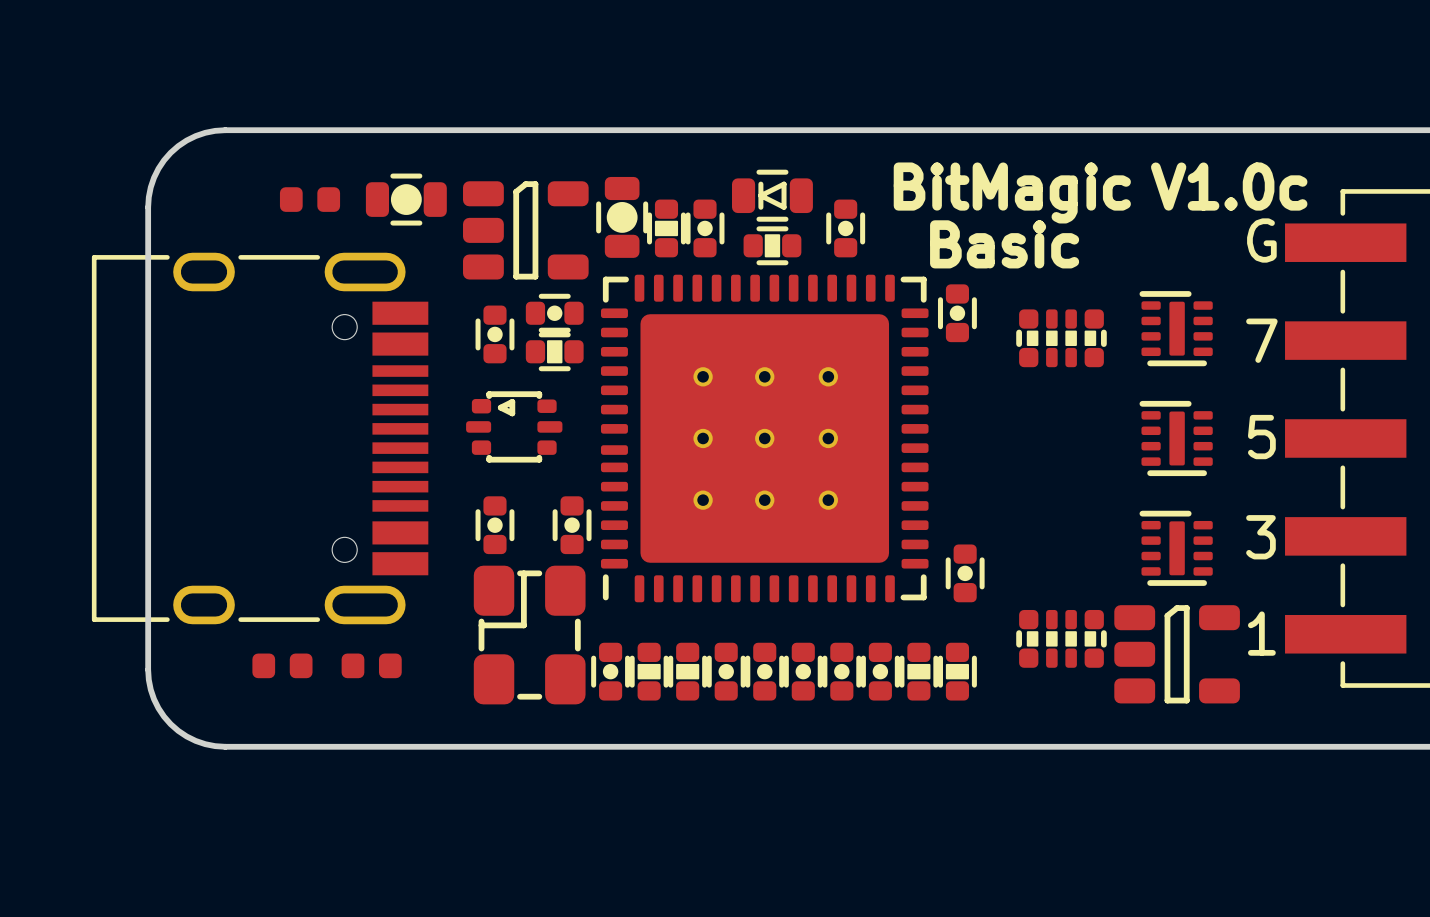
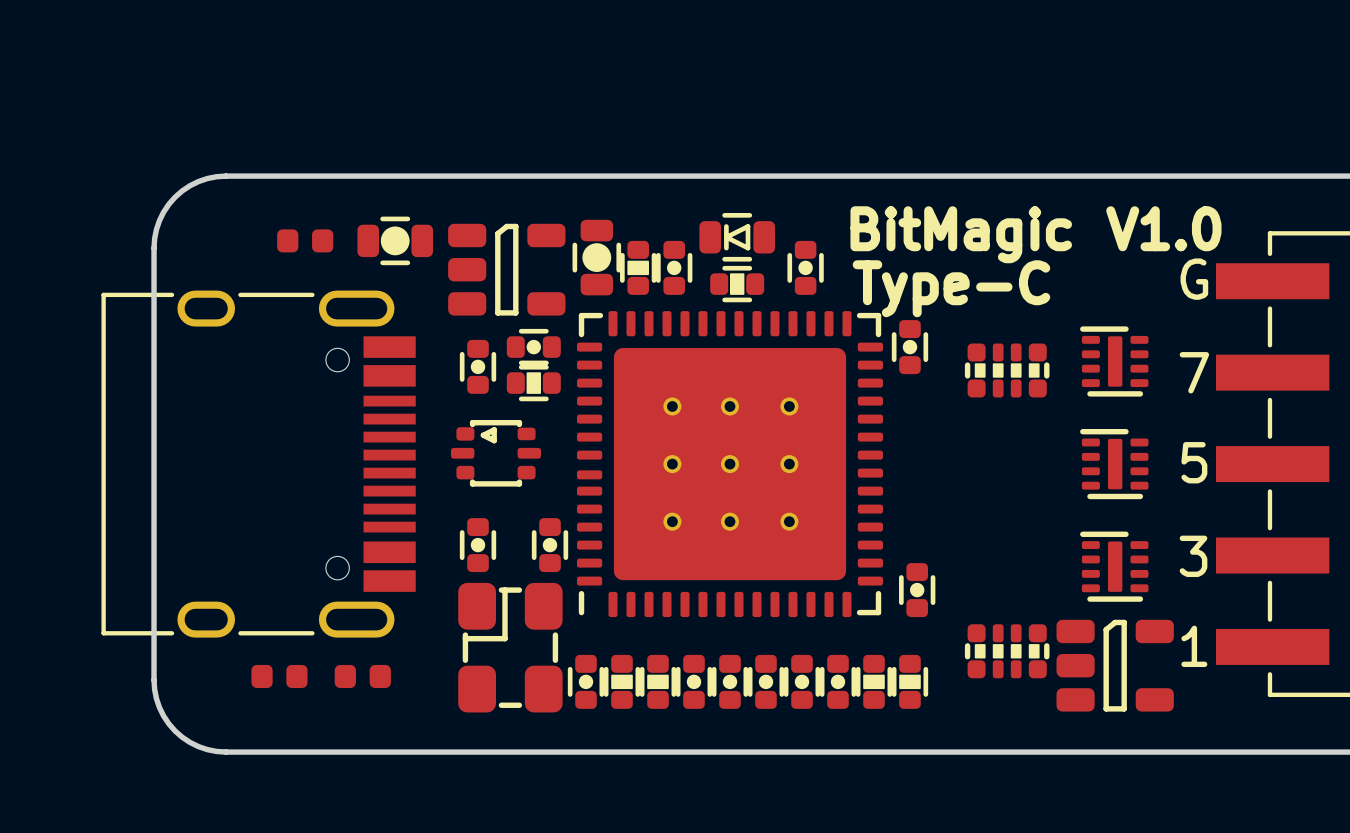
text: V1.0c (1229, 186) -> V1.0 (1163, 228)
text: Basic (1004, 244) -> Type-C (951, 288)

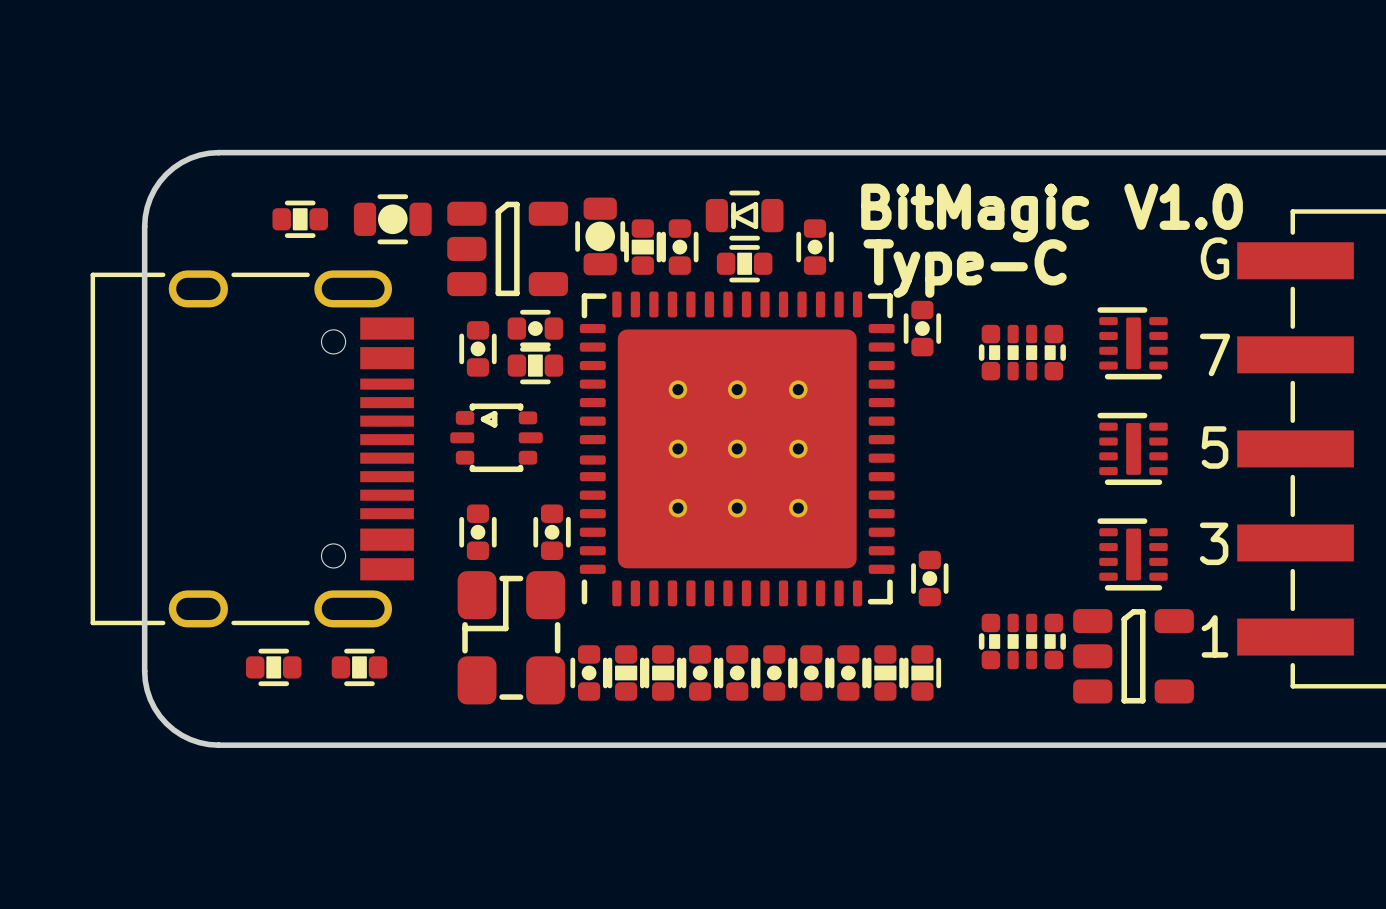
part footprint: [277, 229, 334, 253] -> [272, 200, 328, 238]
part footprint: [251, 664, 308, 688] -> [245, 648, 302, 687]
part footprint: [334, 664, 391, 688] -> [331, 648, 388, 687]

